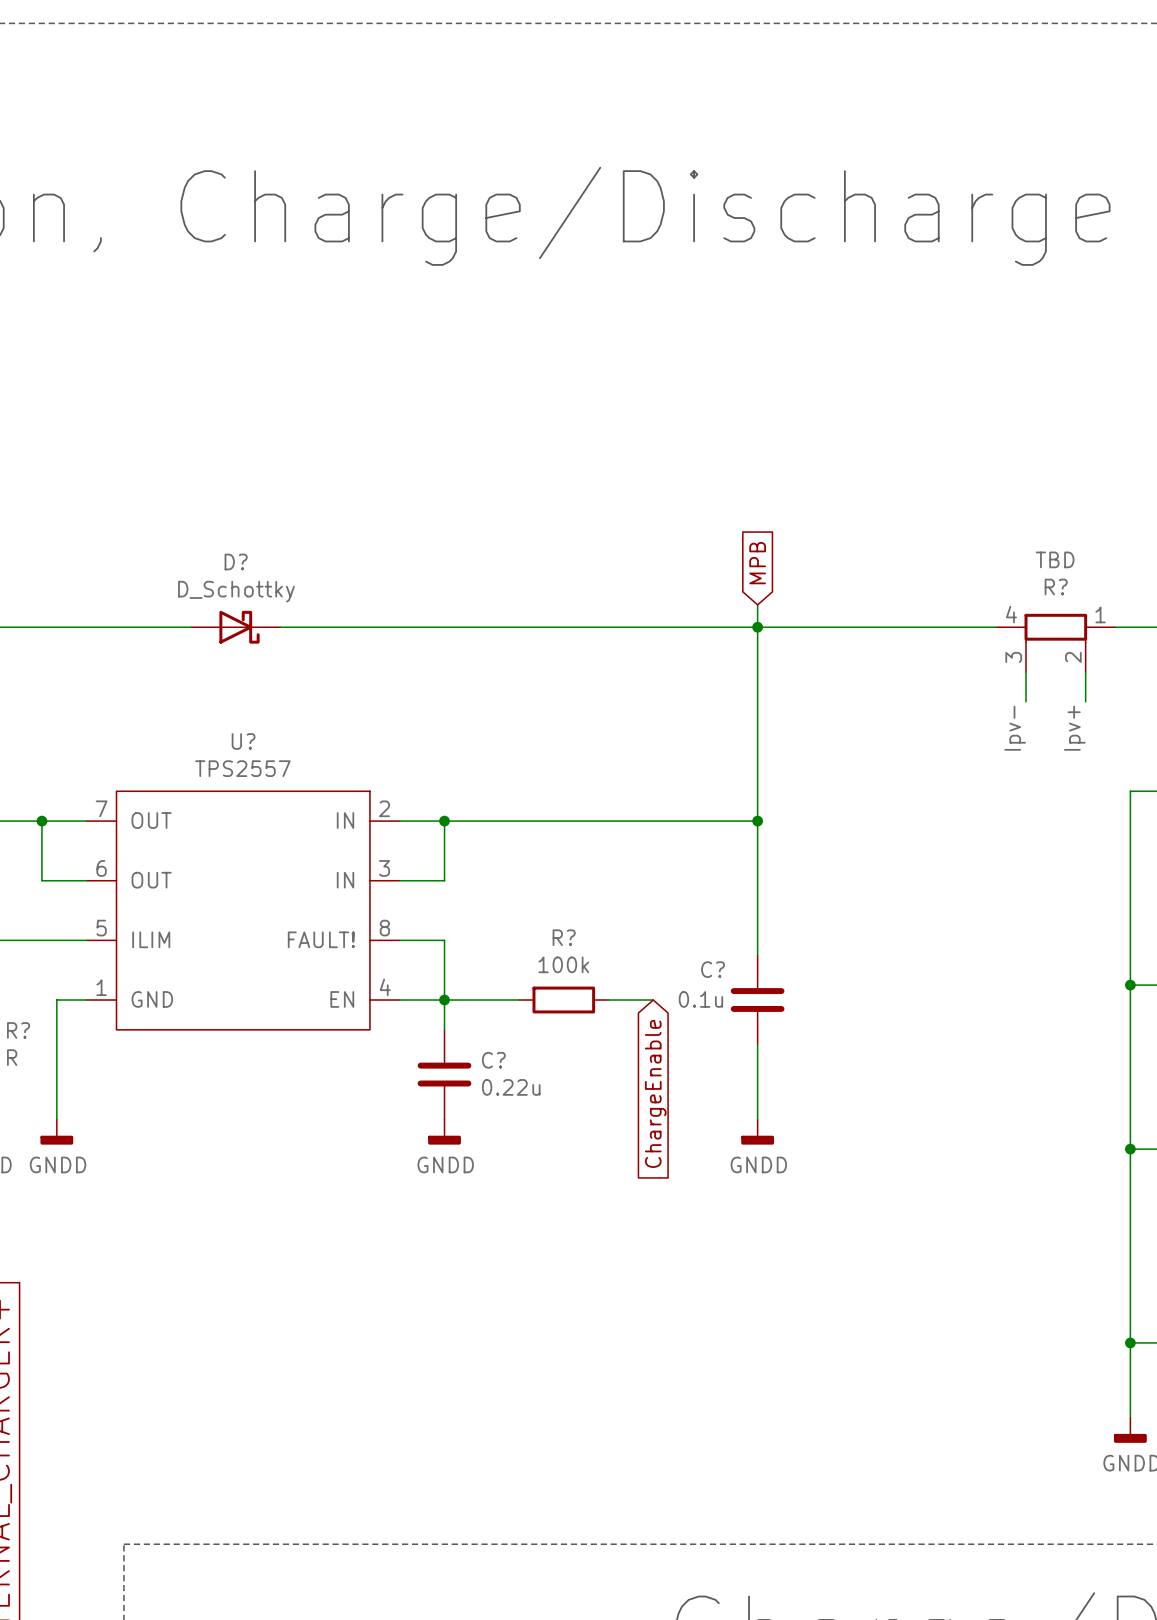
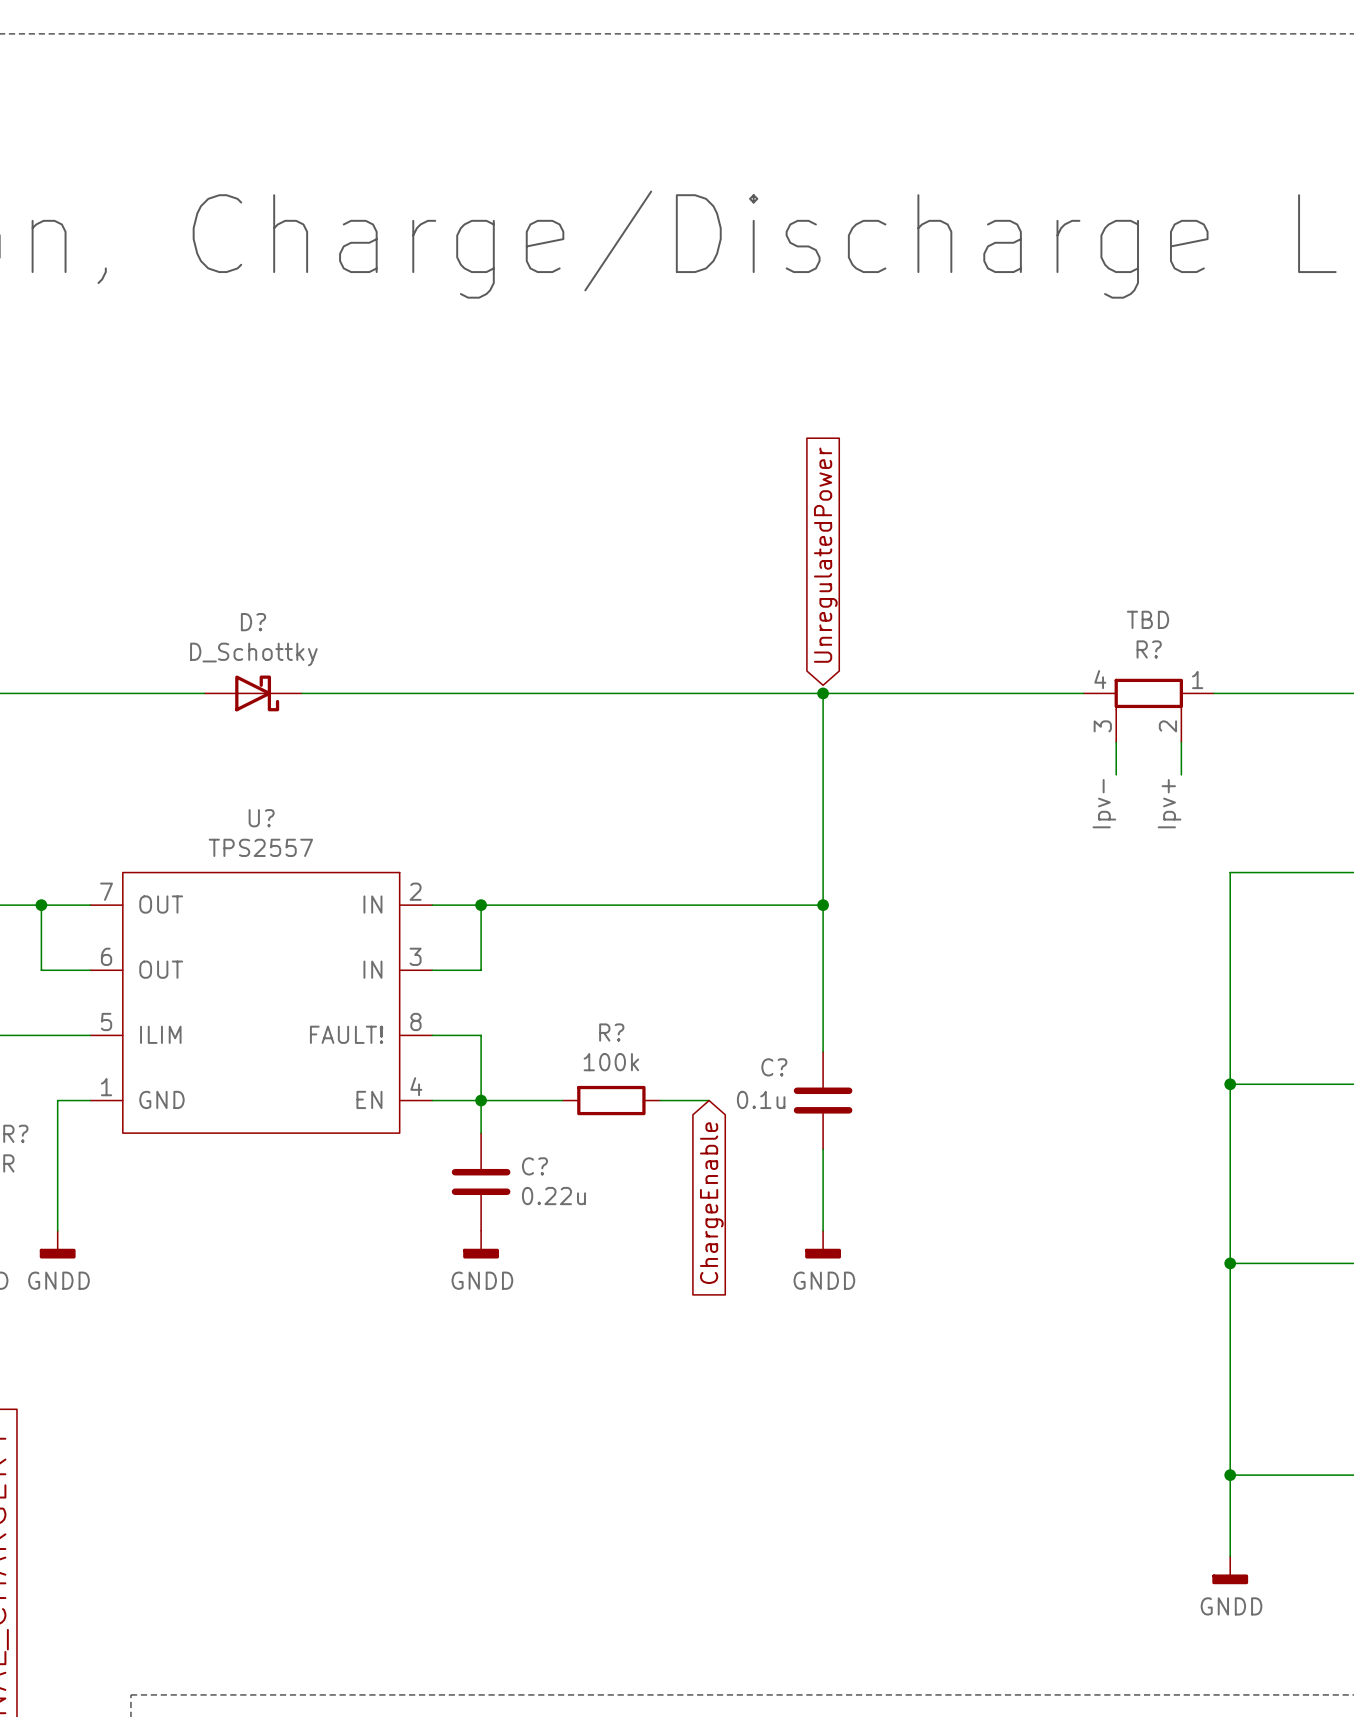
global label: none -> UnregulatedPower (825, 555)
global label: MPB (757, 563) -> none
wire: (757, 604) (757, 627) -> none

